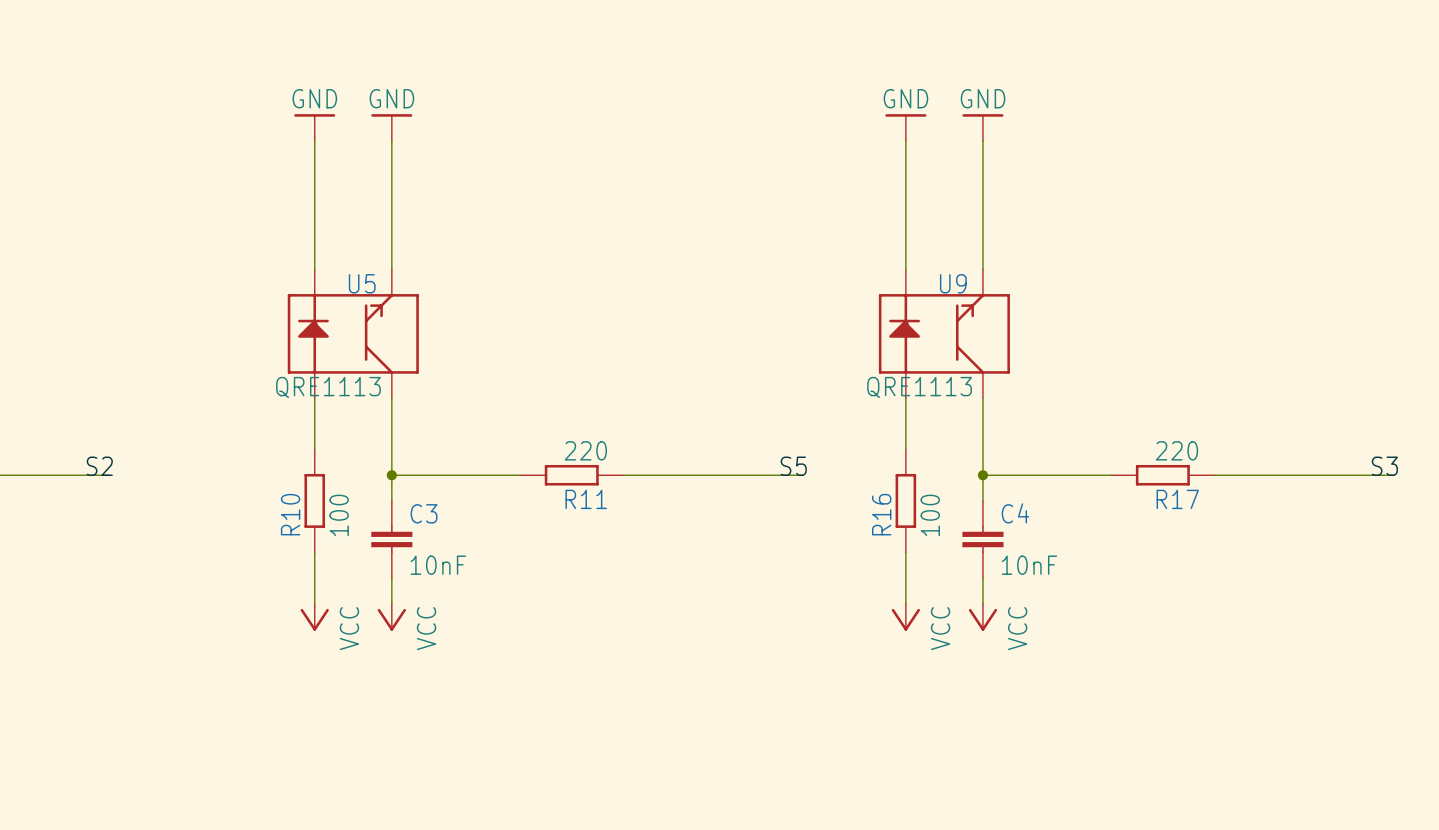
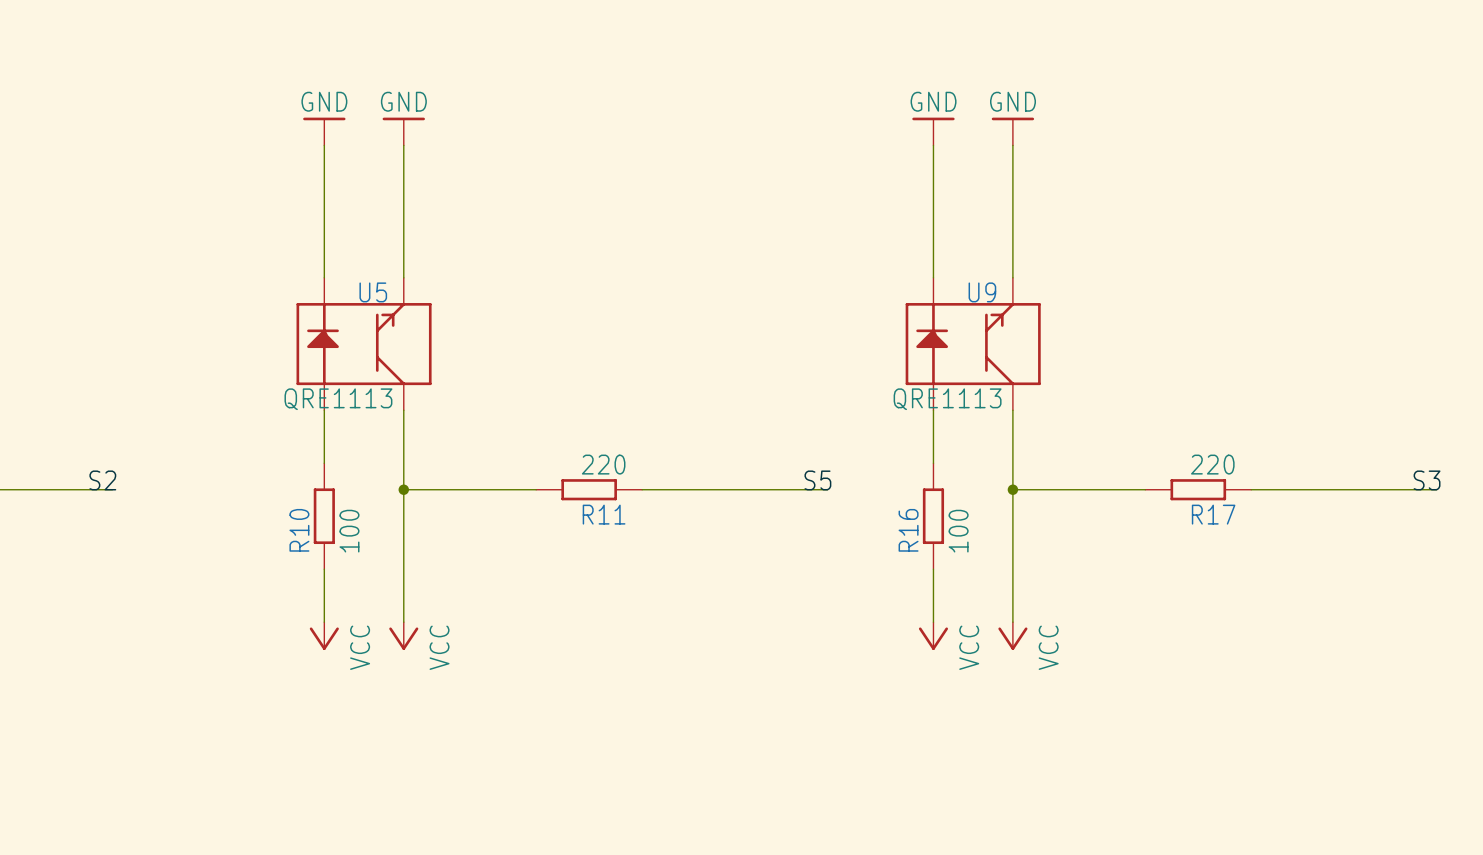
C3: 10nF (391, 539) -> none
C4: 10nF (982, 539) -> none

